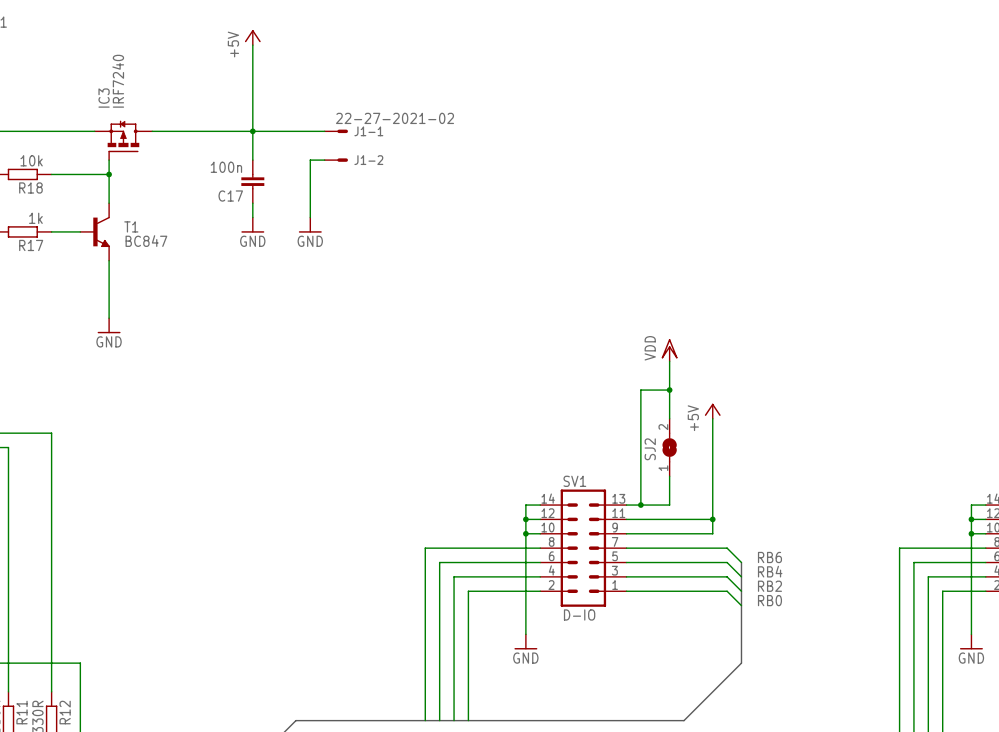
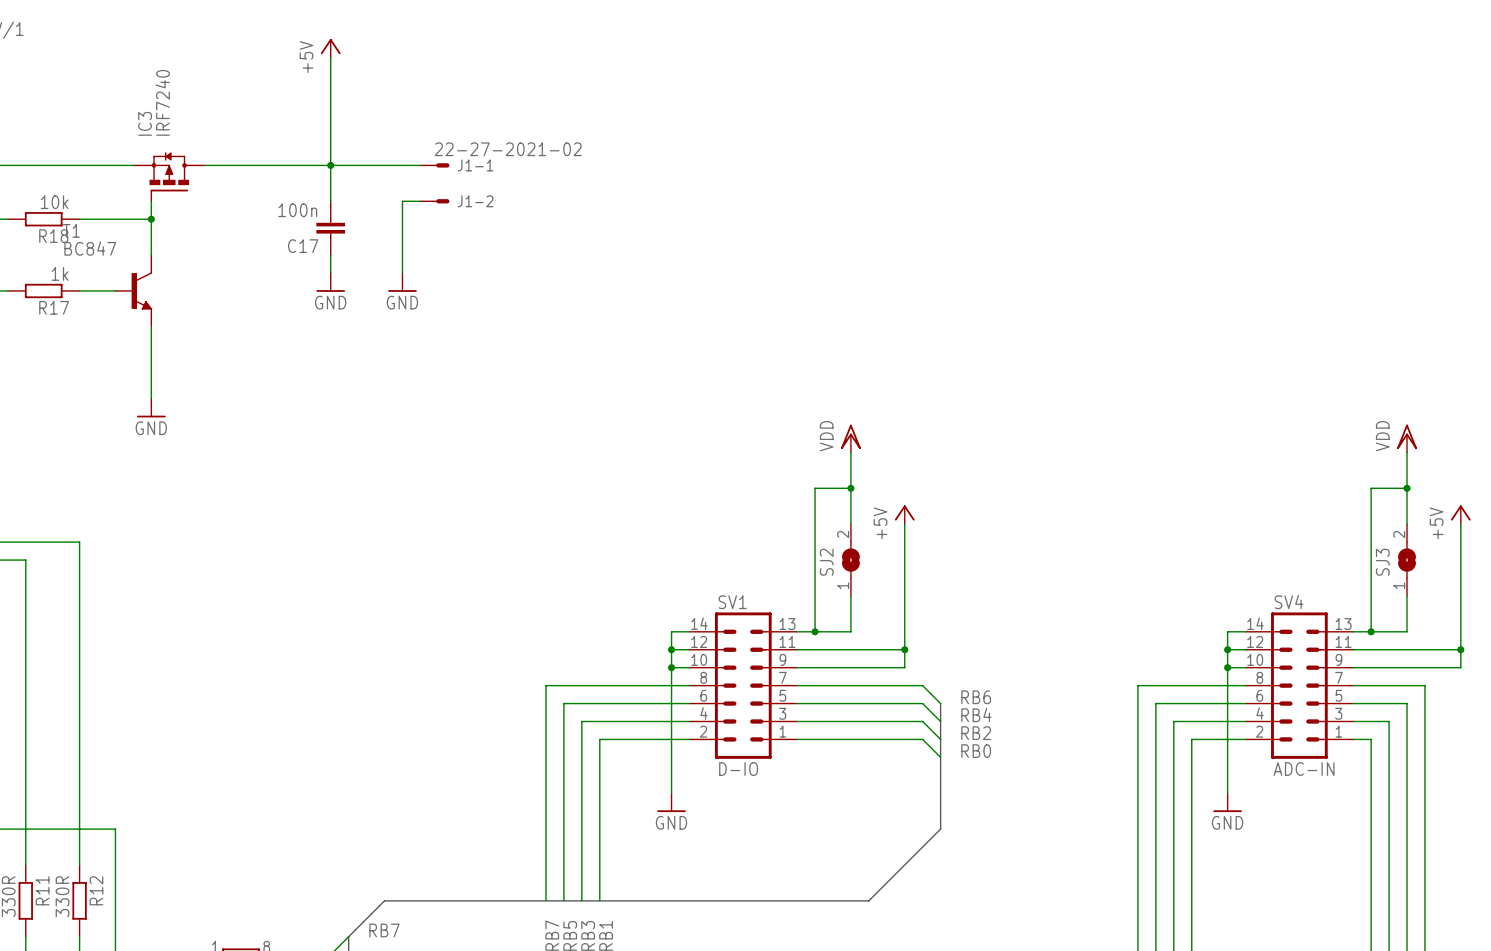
T1 name position: T1 (131, 226) -> T1 (71, 230)
T1 value position: BC847 (146, 241) -> BC847 (90, 248)

